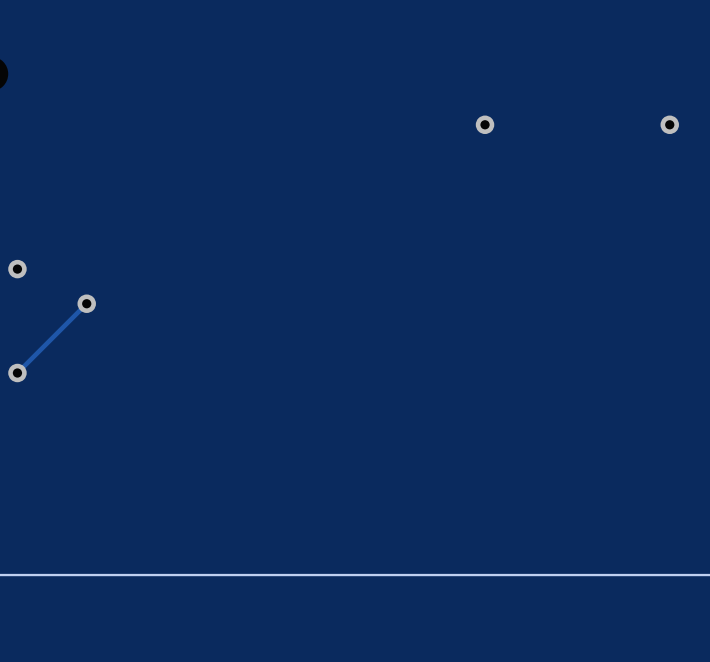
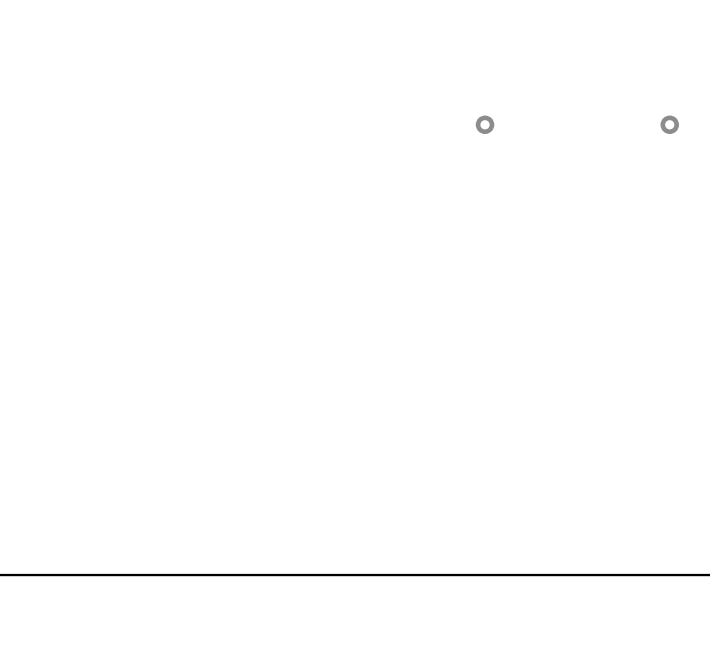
via: (17, 269) -> none
track: (86, 303) (17, 373) -> none
via: (86, 303) -> none
via: (17, 373) -> none

